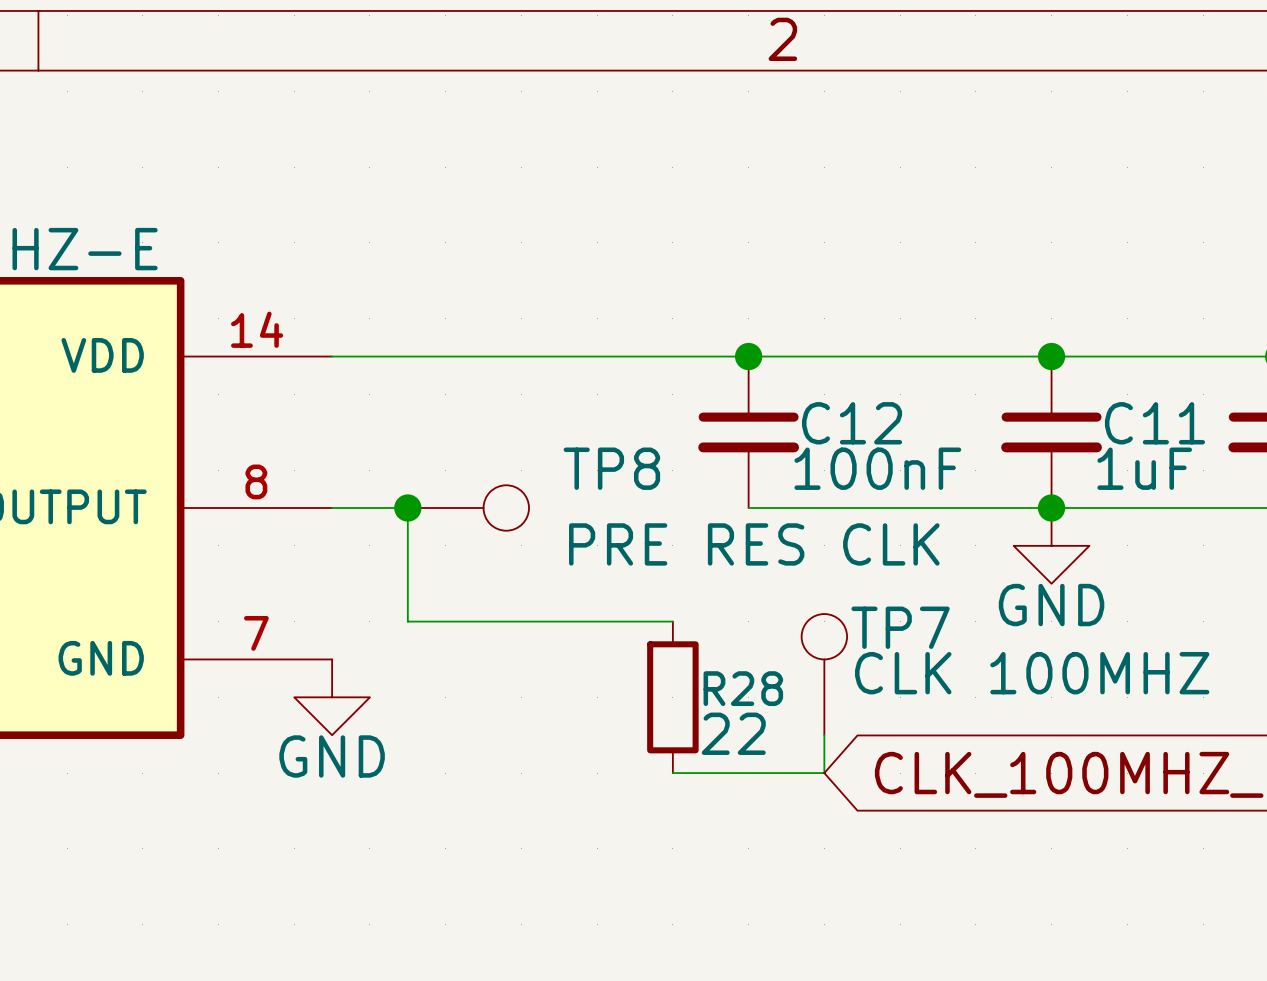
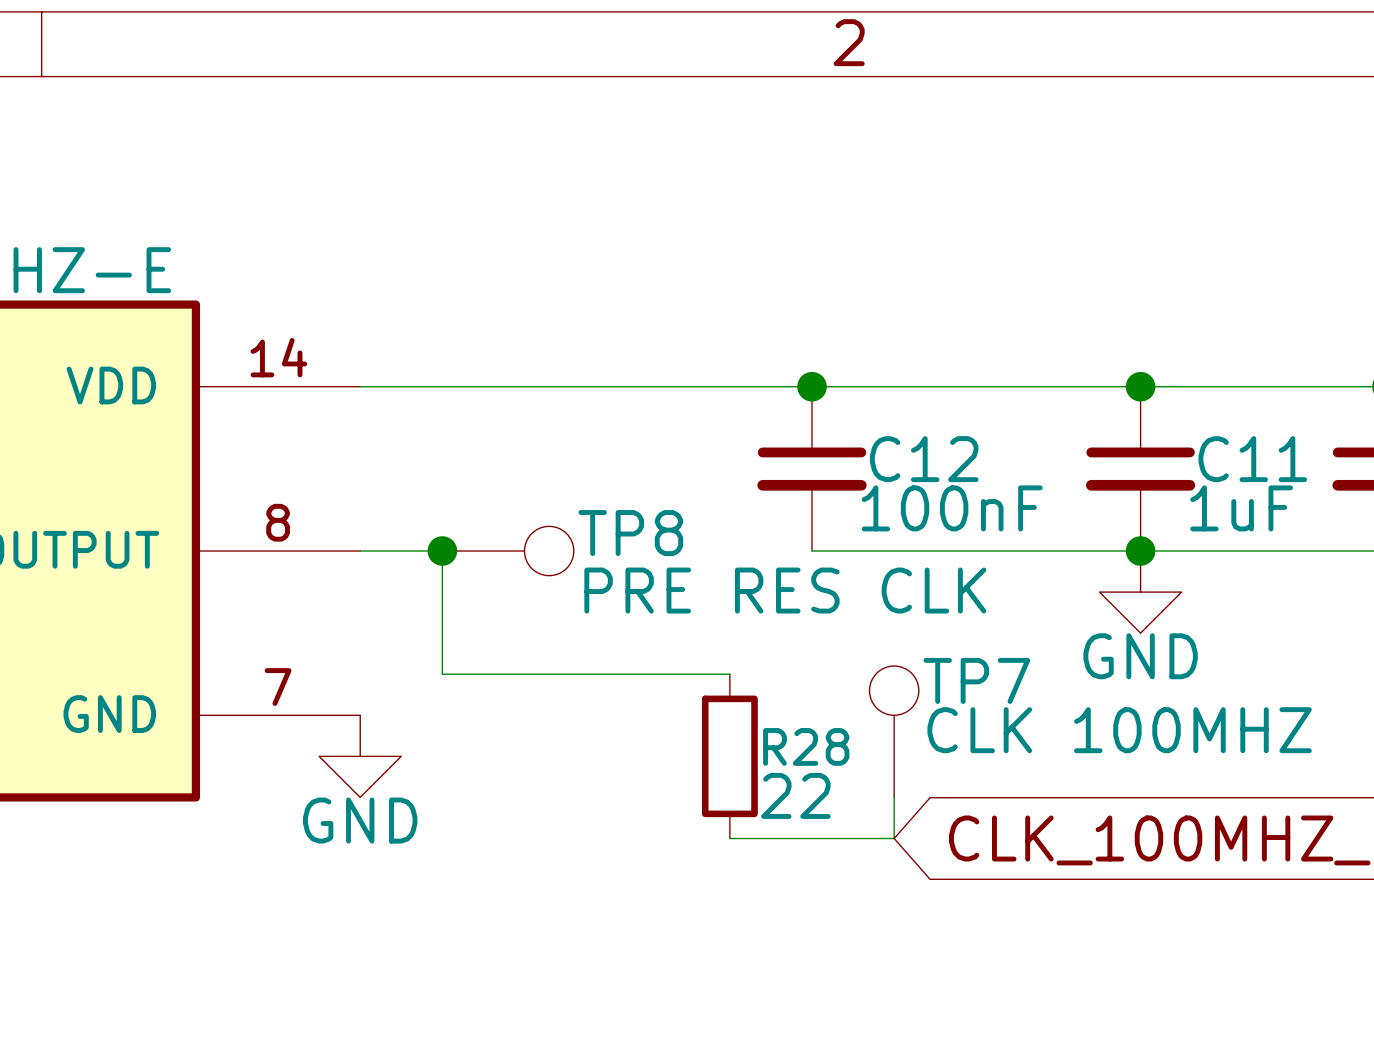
TP8 name position: TP8 (611, 468) -> TP8 (630, 533)
TP8 value position: PRE RES CLK (754, 544) -> PRE RES CLK (785, 590)

